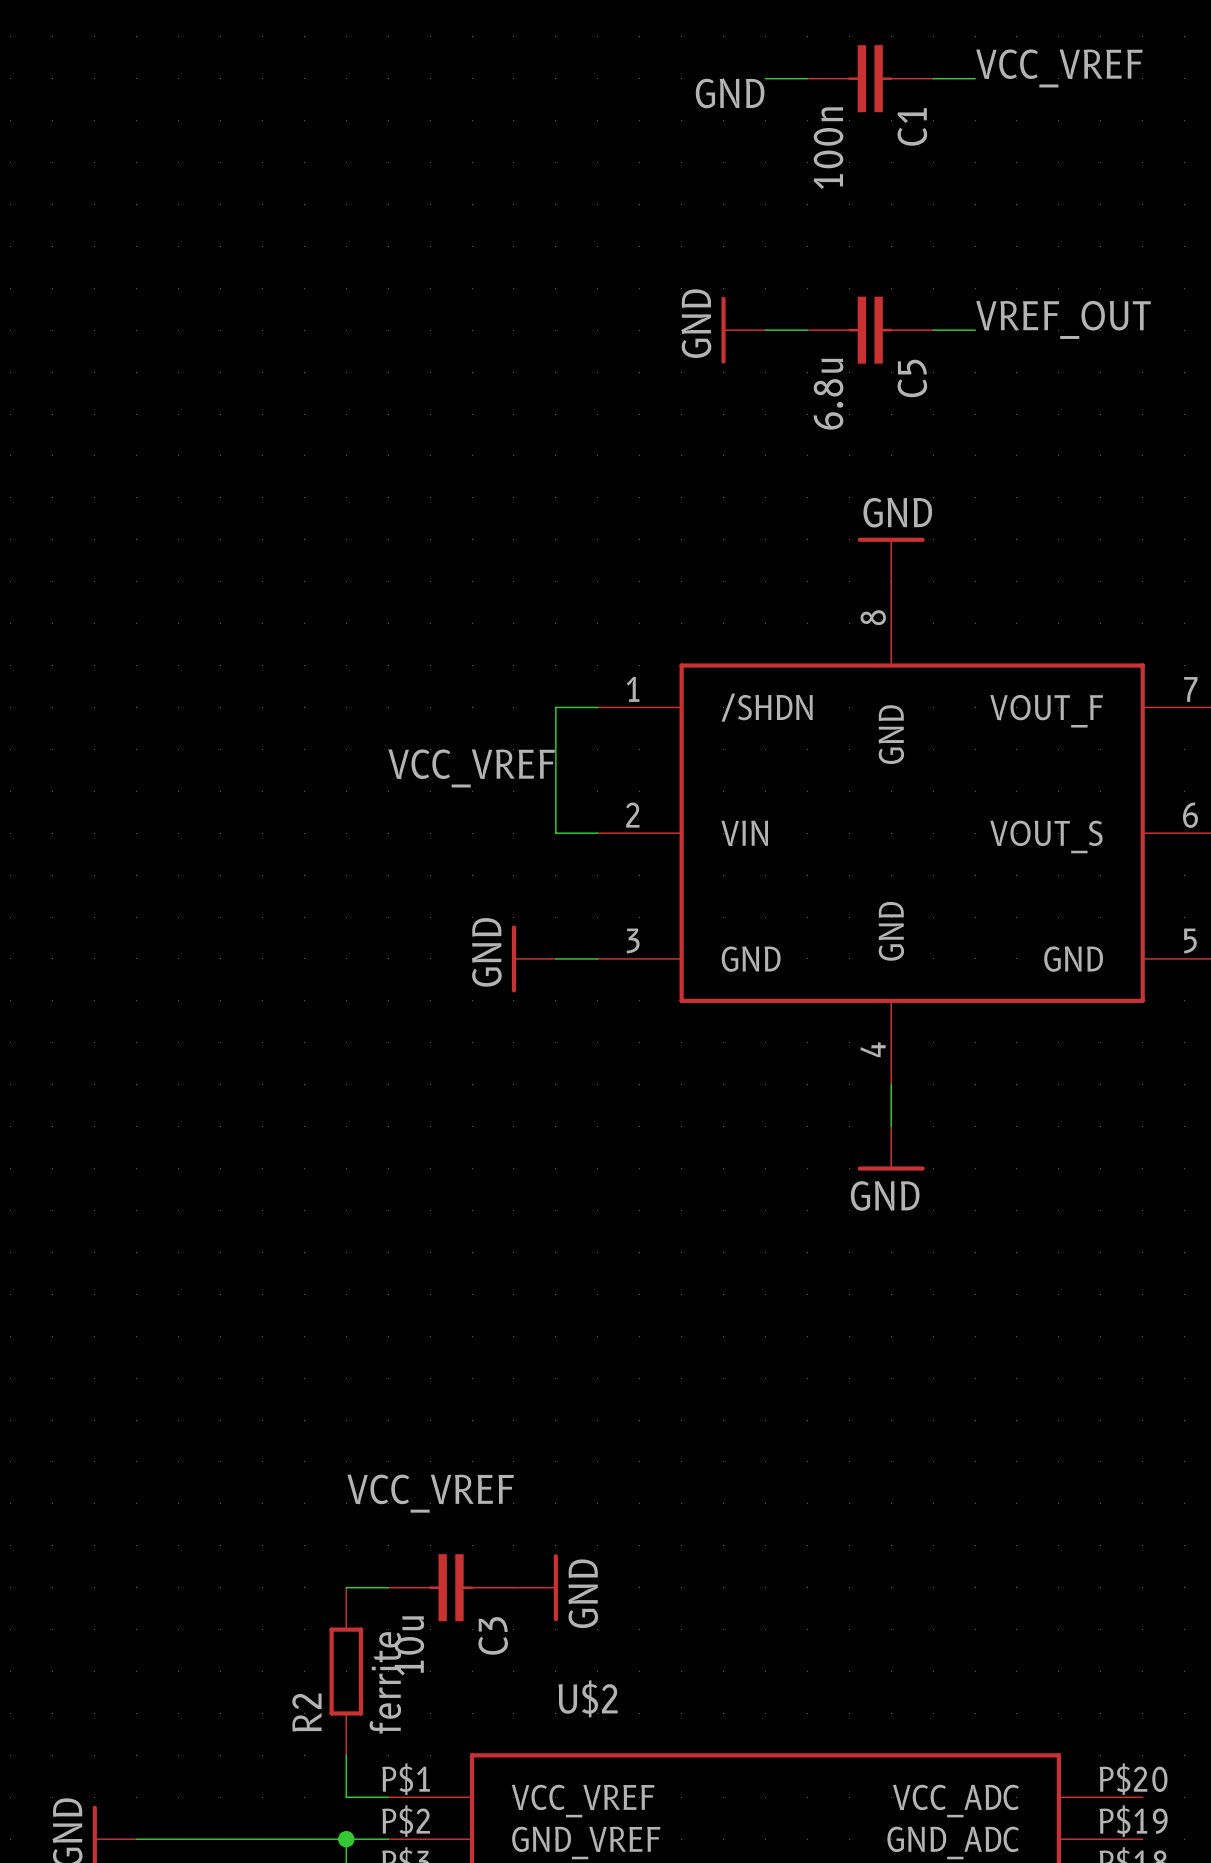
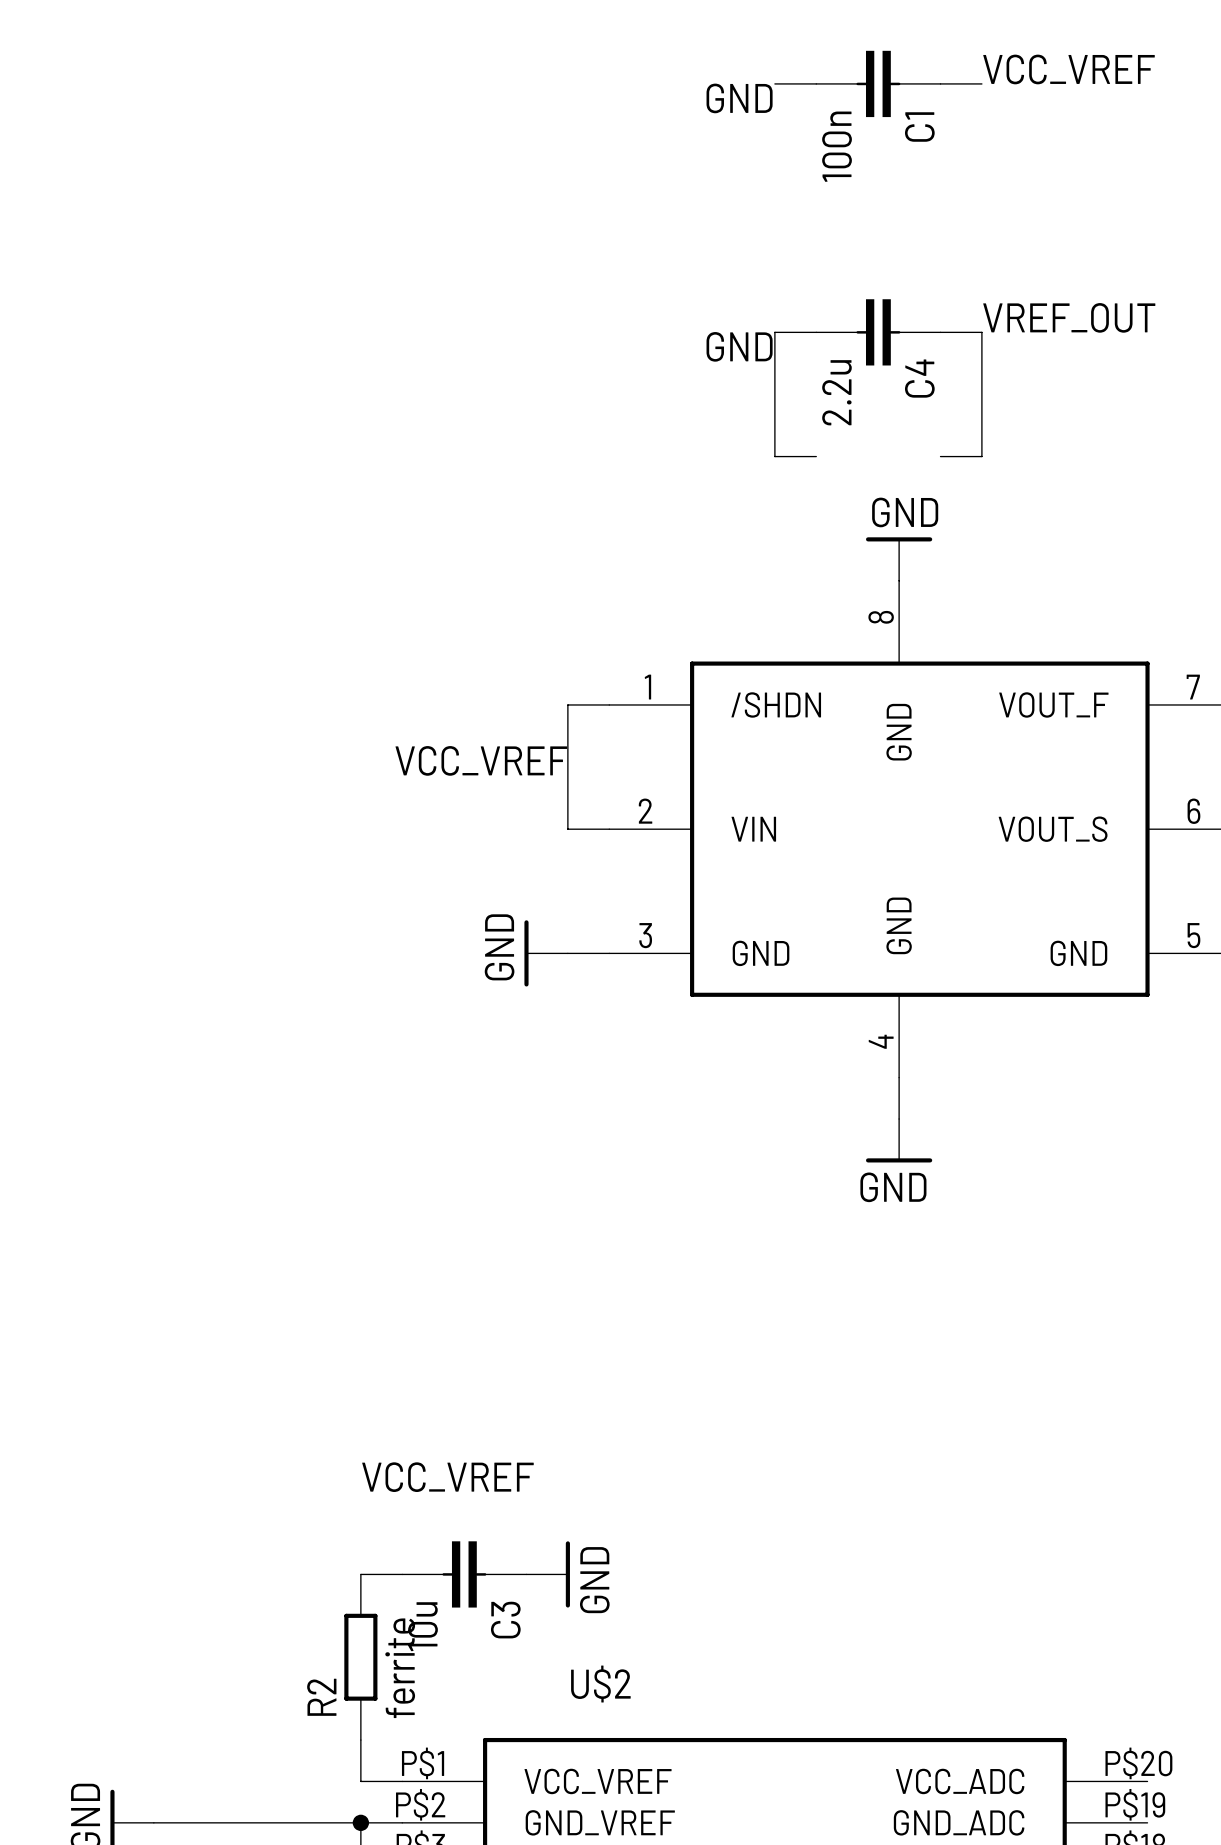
power symbol: GND (743, 330) -> none
wire: none -> (774, 332) (774, 456) (816, 456)
wire: none -> (981, 332) (981, 456) (940, 456)
label: none -> GND (739, 346)
C5 name: C5 (912, 378) -> C4 (919, 378)
C5 value: 6.8u (828, 394) -> 2.2u (836, 392)

